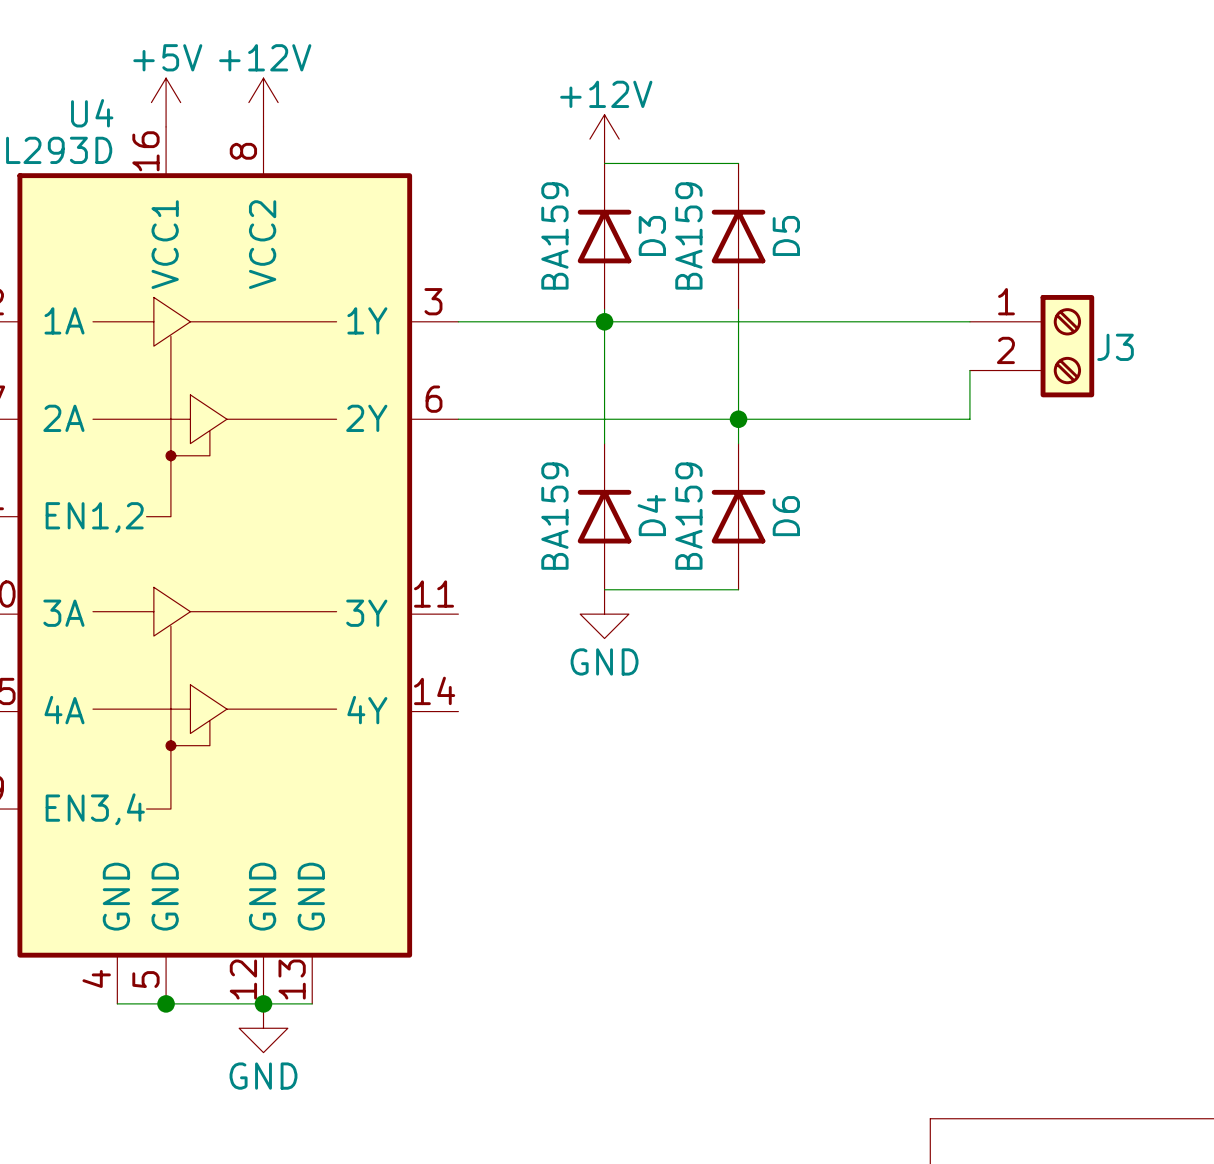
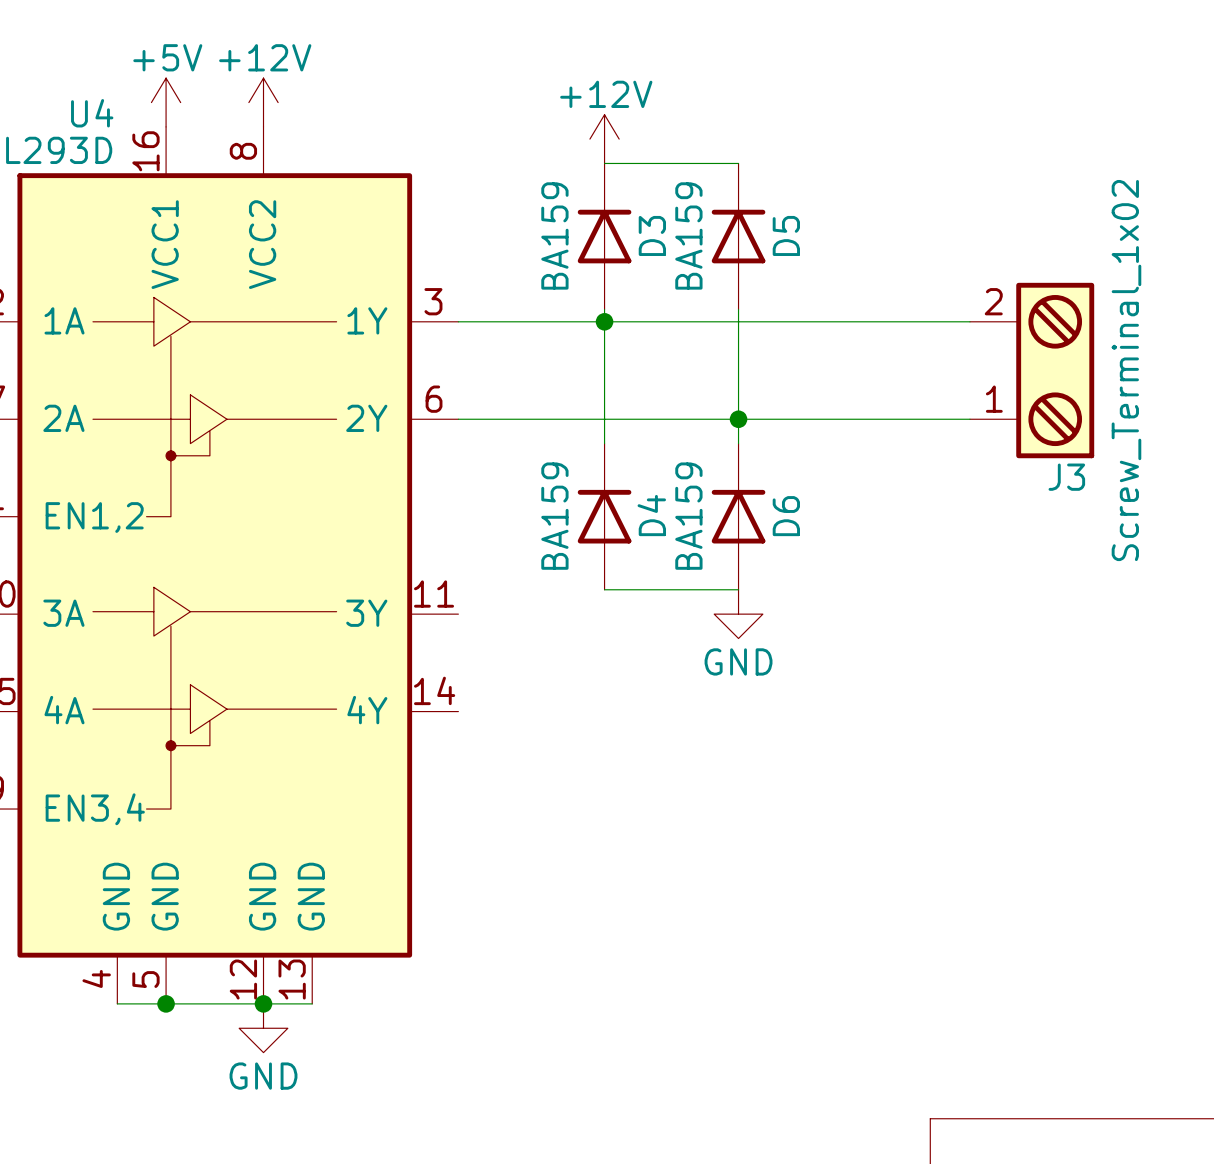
J3 symbol: [969, 295, 1095, 398] -> [969, 282, 1095, 459]
J3 name position: J3 (1115, 347) -> J3 (1066, 477)
wire: (969, 370) (969, 419) -> none
J3 value: none -> Screw_Terminal_1x02 (1126, 370)
power symbol position: GND (604, 614) -> GND (738, 614)

